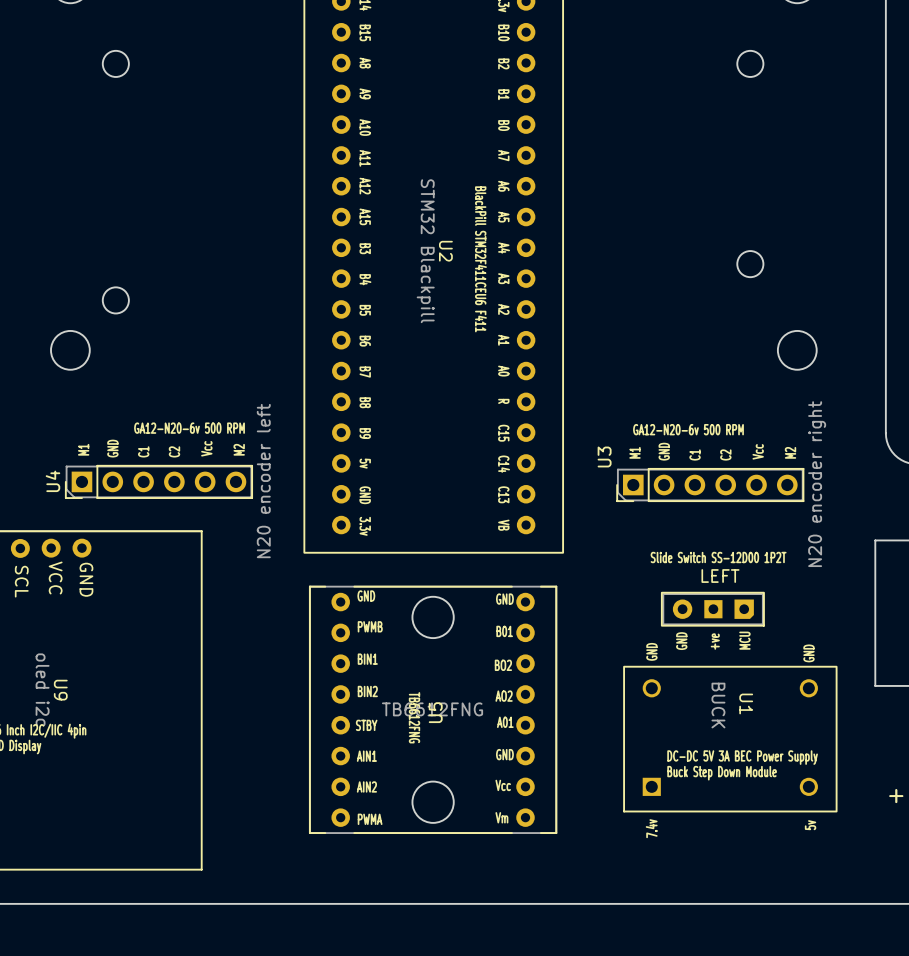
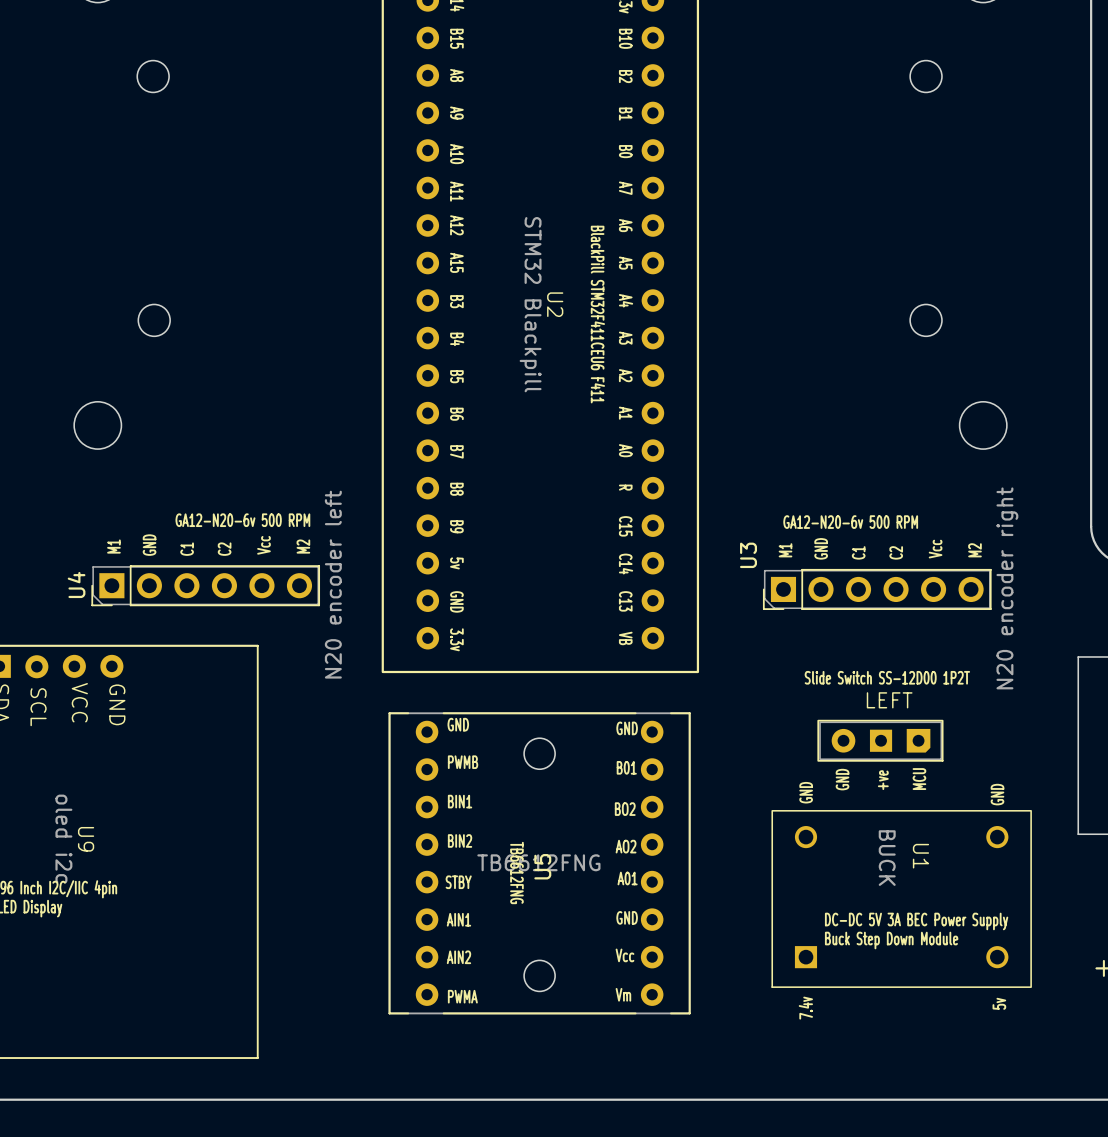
round board edge position: (115, 300) -> (154, 320)
round board edge size: [412, 596, 455, 639] -> [523, 737, 556, 770]
round board edge size: [412, 781, 455, 824] -> [523, 960, 556, 992]

